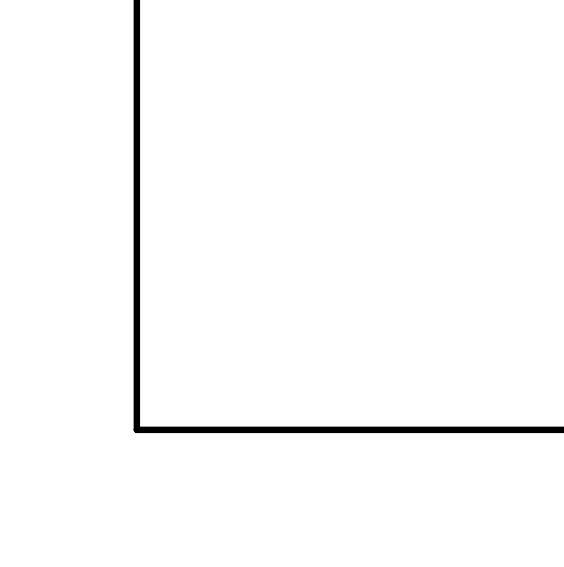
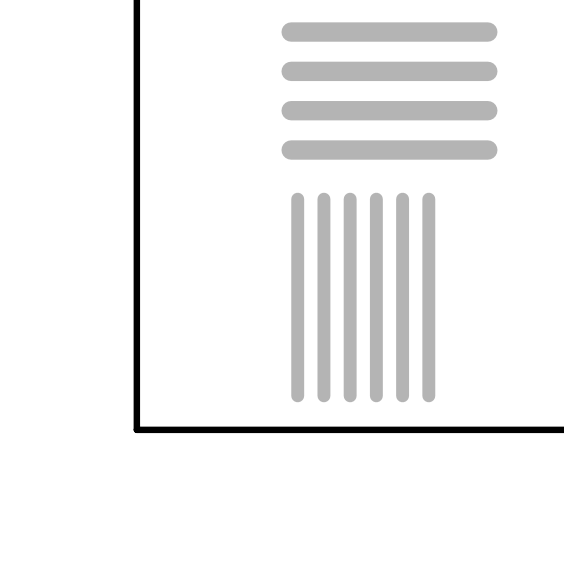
track: none -> (291, 32) (487, 32)
track: none -> (291, 71) (487, 71)
track: none -> (291, 110) (487, 110)
track: none -> (291, 150) (487, 150)
track: none -> (297, 199) (297, 395)
track: none -> (323, 199) (323, 395)
track: none -> (350, 199) (350, 395)
track: none -> (376, 199) (376, 395)
track: none -> (402, 199) (402, 395)
track: none -> (428, 199) (428, 395)

